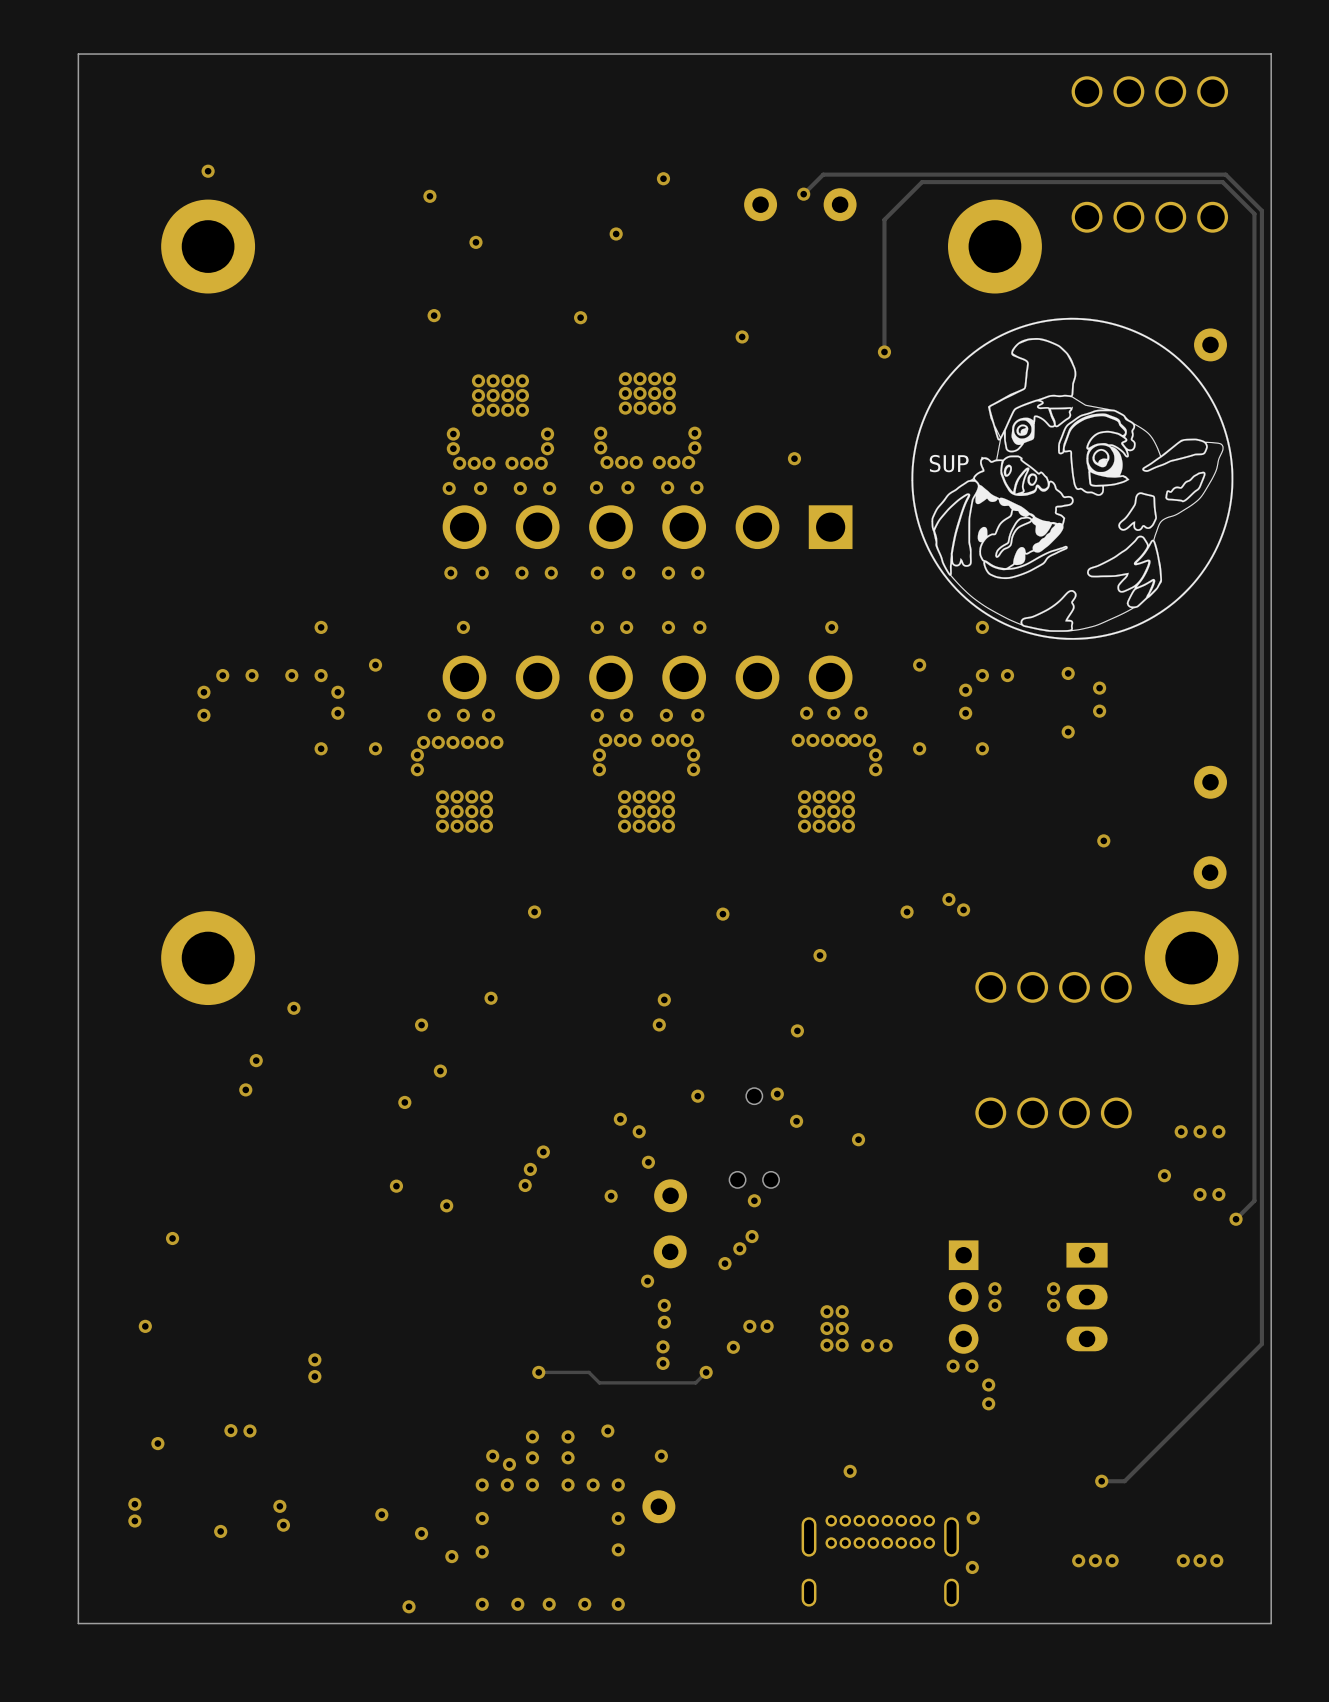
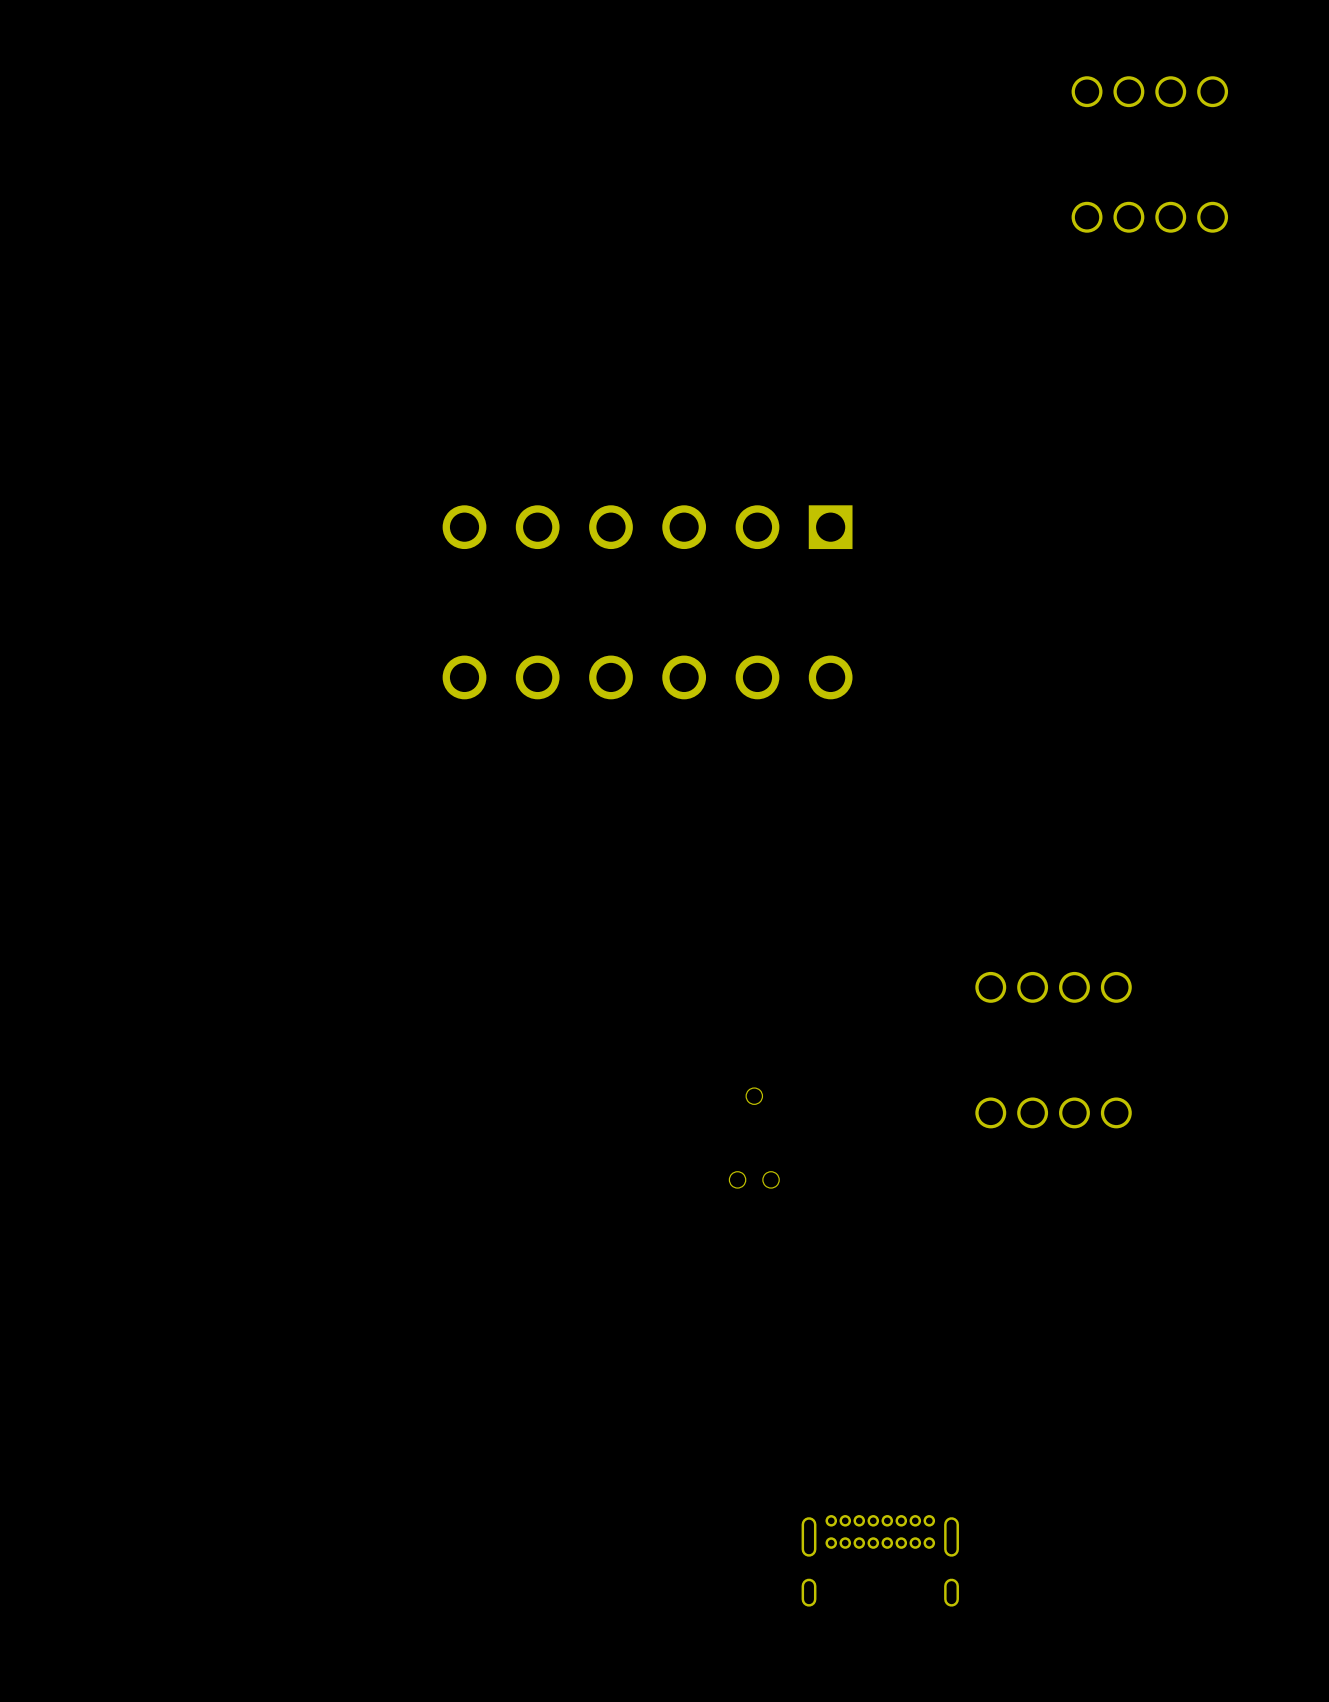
board edge: (1271, 54) (78, 54) (78, 1623) (1271, 1623) (1271, 54) -> none
via: (208, 171) -> none
via: (663, 178) -> none
track: (803, 194) (823, 174) (1225, 174) (1261, 210) (1261, 1344) (1124, 1481) (1101, 1481) -> none
via: (803, 194) -> none
via: (429, 196) -> none
part: (760, 204) -> none
part: (840, 204) -> none
via: (616, 233) -> none
via: (475, 242) -> none
part: (208, 246) -> none
part: (994, 246) -> none
via: (434, 315) -> none
via: (580, 317) -> none
drawing: [911, 317, 1234, 640] -> none
via: (742, 336) -> none
part: (1210, 344) -> none
track: (884, 352) (884, 219) (922, 182) (1222, 182) (1254, 213) (1254, 1200) (1236, 1219) -> none
via: (884, 352) -> none
via: (625, 378) -> none
via: (640, 378) -> none
via: (654, 378) -> none
via: (669, 378) -> none
via: (478, 380) -> none
via: (493, 380) -> none
via: (507, 380) -> none
via: (522, 380) -> none
via: (625, 393) -> none
via: (640, 393) -> none
via: (654, 393) -> none
via: (669, 393) -> none
via: (478, 395) -> none
via: (493, 395) -> none
via: (507, 395) -> none
via: (522, 395) -> none
via: (625, 408) -> none
via: (640, 408) -> none
via: (654, 408) -> none
via: (669, 408) -> none
via: (478, 410) -> none
via: (493, 410) -> none
via: (507, 410) -> none
via: (522, 410) -> none
via: (600, 433) -> none
via: (694, 433) -> none
via: (453, 434) -> none
via: (547, 434) -> none
via: (600, 447) -> none
via: (694, 447) -> none
via: (453, 448) -> none
via: (547, 448) -> none
via: (794, 458) -> none
via: (606, 462) -> none
via: (621, 462) -> none
via: (636, 462) -> none
via: (659, 462) -> none
via: (673, 462) -> none
via: (688, 462) -> none
via: (459, 463) -> none
via: (474, 463) -> none
via: (488, 463) -> none
via: (511, 463) -> none
via: (526, 463) -> none
via: (541, 463) -> none
text: SUP (949, 463) -> none
via: (596, 487) -> none
via: (627, 487) -> none
via: (667, 487) -> none
via: (696, 487) -> none
via: (449, 488) -> none
via: (480, 488) -> none
via: (520, 488) -> none
via: (549, 488) -> none
via: (450, 573) -> none
via: (482, 573) -> none
via: (522, 573) -> none
via: (551, 573) -> none
via: (597, 573) -> none
via: (628, 573) -> none
via: (668, 573) -> none
via: (697, 573) -> none
via: (321, 627) -> none
via: (463, 627) -> none
via: (597, 627) -> none
via: (626, 627) -> none
via: (668, 627) -> none
via: (699, 627) -> none
via: (831, 627) -> none
via: (982, 627) -> none
via: (375, 665) -> none
via: (919, 665) -> none
via: (1068, 673) -> none
via: (222, 675) -> none
via: (252, 675) -> none
via: (291, 675) -> none
via: (321, 675) -> none
via: (982, 675) -> none
via: (1007, 675) -> none
via: (1099, 688) -> none
via: (965, 690) -> none
via: (203, 692) -> none
via: (337, 692) -> none
via: (1099, 711) -> none
via: (337, 713) -> none
via: (806, 713) -> none
via: (833, 713) -> none
via: (861, 713) -> none
via: (965, 713) -> none
via: (203, 715) -> none
via: (434, 715) -> none
via: (463, 715) -> none
via: (488, 715) -> none
via: (597, 715) -> none
via: (626, 715) -> none
via: (666, 715) -> none
via: (697, 715) -> none
via: (1068, 732) -> none
via: (605, 740) -> none
via: (620, 740) -> none
via: (635, 740) -> none
via: (658, 740) -> none
via: (672, 740) -> none
via: (687, 740) -> none
via: (798, 740) -> none
via: (812, 740) -> none
via: (827, 740) -> none
via: (842, 740) -> none
via: (854, 740) -> none
via: (869, 740) -> none
via: (423, 742) -> none
via: (438, 742) -> none
via: (452, 742) -> none
via: (467, 742) -> none
via: (482, 742) -> none
via: (496, 742) -> none
via: (321, 748) -> none
via: (375, 748) -> none
via: (919, 748) -> none
via: (982, 748) -> none
via: (417, 755) -> none
via: (599, 755) -> none
via: (693, 755) -> none
via: (875, 755) -> none
via: (417, 769) -> none
via: (599, 769) -> none
via: (693, 769) -> none
via: (875, 769) -> none
part: (1210, 782) -> none
via: (442, 796) -> none
via: (457, 796) -> none
via: (471, 796) -> none
via: (486, 796) -> none
via: (624, 796) -> none
via: (639, 796) -> none
via: (653, 796) -> none
via: (668, 796) -> none
via: (804, 796) -> none
via: (819, 796) -> none
via: (833, 796) -> none
via: (848, 796) -> none
via: (442, 811) -> none
via: (457, 811) -> none
via: (471, 811) -> none
via: (486, 811) -> none
via: (624, 811) -> none
via: (639, 811) -> none
via: (653, 811) -> none
via: (668, 811) -> none
via: (804, 811) -> none
via: (819, 811) -> none
via: (833, 811) -> none
via: (848, 811) -> none
via: (442, 826) -> none
via: (457, 826) -> none
via: (471, 826) -> none
via: (486, 826) -> none
via: (624, 826) -> none
via: (639, 826) -> none
via: (653, 826) -> none
via: (668, 826) -> none
via: (804, 826) -> none
via: (819, 826) -> none
via: (833, 826) -> none
via: (848, 826) -> none
via: (1103, 840) -> none
part: (1210, 872) -> none
via: (948, 899) -> none
via: (963, 909) -> none
via: (534, 912) -> none
via: (907, 912) -> none
via: (722, 914) -> none
via: (820, 955) -> none
part: (208, 958) -> none
part: (1191, 958) -> none
via: (491, 998) -> none
via: (664, 999) -> none
via: (293, 1008) -> none
via: (659, 1024) -> none
via: (421, 1025) -> none
via: (797, 1030) -> none
via: (256, 1060) -> none
via: (440, 1071) -> none
via: (245, 1089) -> none
via: (777, 1094) -> none
via: (697, 1096) -> none
via: (404, 1102) -> none
via: (620, 1119) -> none
via: (796, 1121) -> none
via: (639, 1131) -> none
via: (1181, 1131) -> none
via: (1200, 1131) -> none
via: (1218, 1131) -> none
via: (858, 1139) -> none
via: (543, 1152) -> none
via: (648, 1162) -> none
via: (530, 1169) -> none
via: (1164, 1175) -> none
via: (525, 1185) -> none
via: (396, 1186) -> none
via: (1200, 1194) -> none
via: (1218, 1194) -> none
part: (670, 1195) -> none
via: (611, 1196) -> none
via: (754, 1200) -> none
via: (446, 1205) -> none
via: (1236, 1219) -> none
via: (752, 1236) -> none
via: (172, 1238) -> none
via: (739, 1248) -> none
part: (670, 1251) -> none
via: (725, 1263) -> none
via: (647, 1281) -> none
via: (994, 1288) -> none
via: (1053, 1288) -> none
part: (963, 1297) -> none
part: (1087, 1297) -> none
via: (664, 1305) -> none
via: (994, 1305) -> none
via: (1053, 1305) -> none
via: (826, 1311) -> none
via: (842, 1311) -> none
via: (664, 1322) -> none
via: (145, 1326) -> none
via: (749, 1326) -> none
via: (767, 1326) -> none
via: (826, 1328) -> none
via: (842, 1328) -> none
via: (826, 1345) -> none
via: (842, 1345) -> none
via: (867, 1345) -> none
via: (886, 1345) -> none
via: (663, 1346) -> none
via: (733, 1347) -> none
via: (314, 1359) -> none
via: (663, 1363) -> none
via: (953, 1366) -> none
via: (971, 1366) -> none
via: (538, 1372) -> none
track: (706, 1372) (695, 1382) (599, 1382) (588, 1372) (538, 1372) -> none
via: (706, 1372) -> none
via: (314, 1376) -> none
via: (988, 1384) -> none
via: (988, 1403) -> none
via: (230, 1430) -> none
via: (249, 1431) -> none
via: (607, 1431) -> none
via: (532, 1436) -> none
via: (568, 1436) -> none
via: (157, 1443) -> none
via: (492, 1456) -> none
via: (661, 1456) -> none
via: (532, 1457) -> none
via: (568, 1457) -> none
via: (509, 1464) -> none
via: (850, 1471) -> none
via: (1101, 1481) -> none
via: (482, 1485) -> none
via: (507, 1485) -> none
via: (532, 1485) -> none
via: (568, 1485) -> none
via: (593, 1485) -> none
via: (618, 1485) -> none
via: (134, 1504) -> none
via: (279, 1506) -> none
part: (658, 1506) -> none
via: (381, 1514) -> none
via: (482, 1518) -> none
via: (618, 1518) -> none
via: (973, 1518) -> none
via: (134, 1520) -> none
via: (283, 1525) -> none
via: (220, 1531) -> none
via: (421, 1533) -> none
via: (618, 1549) -> none
via: (482, 1551) -> none
via: (451, 1556) -> none
via: (1078, 1560) -> none
via: (1095, 1560) -> none
via: (1112, 1560) -> none
via: (1183, 1560) -> none
via: (1200, 1560) -> none
via: (1216, 1560) -> none
via: (972, 1567) -> none
via: (482, 1604) -> none
via: (517, 1604) -> none
via: (549, 1604) -> none
via: (584, 1604) -> none
via: (618, 1604) -> none
via: (409, 1606) -> none

